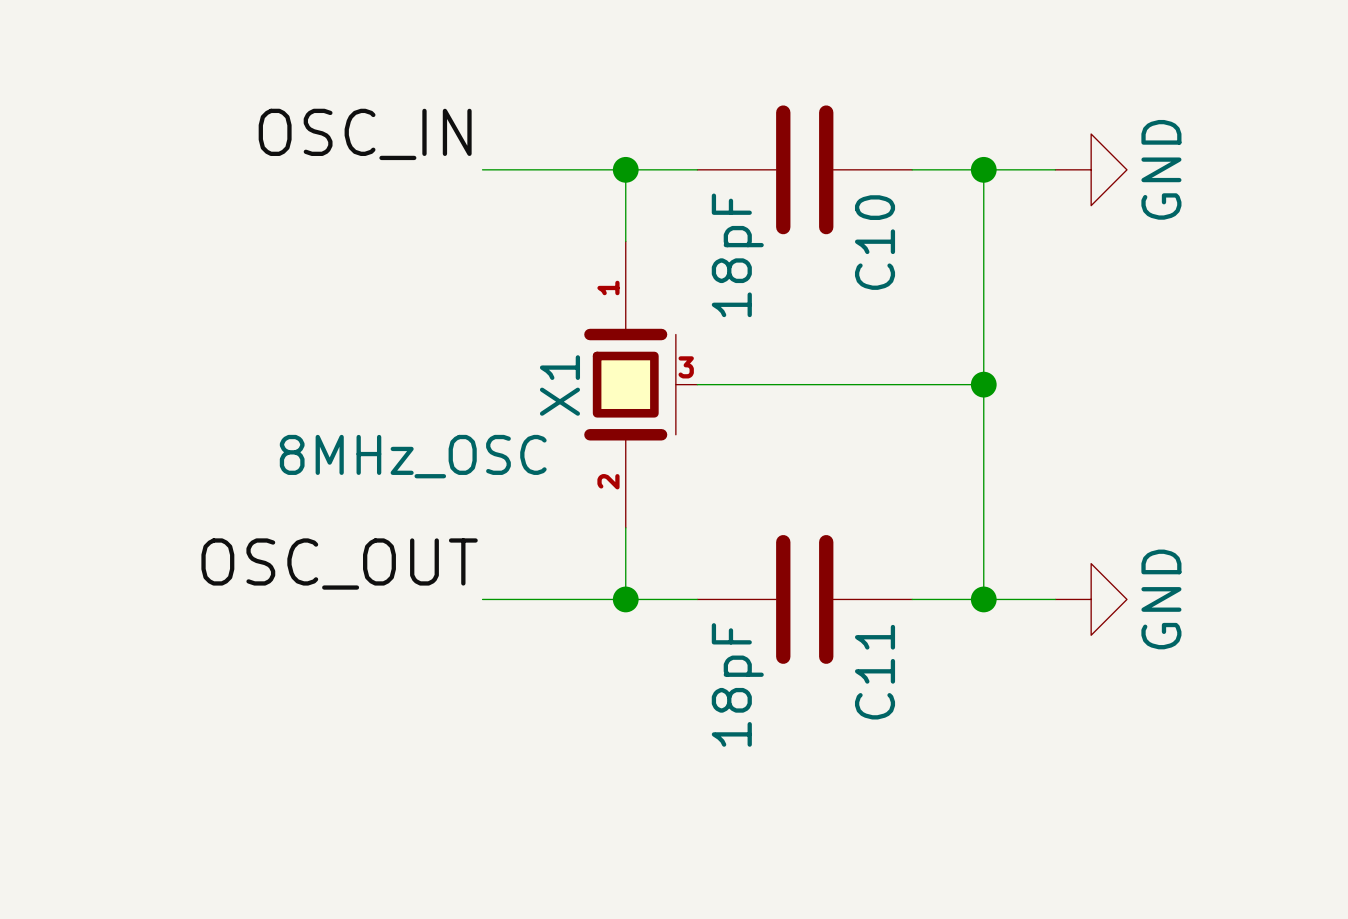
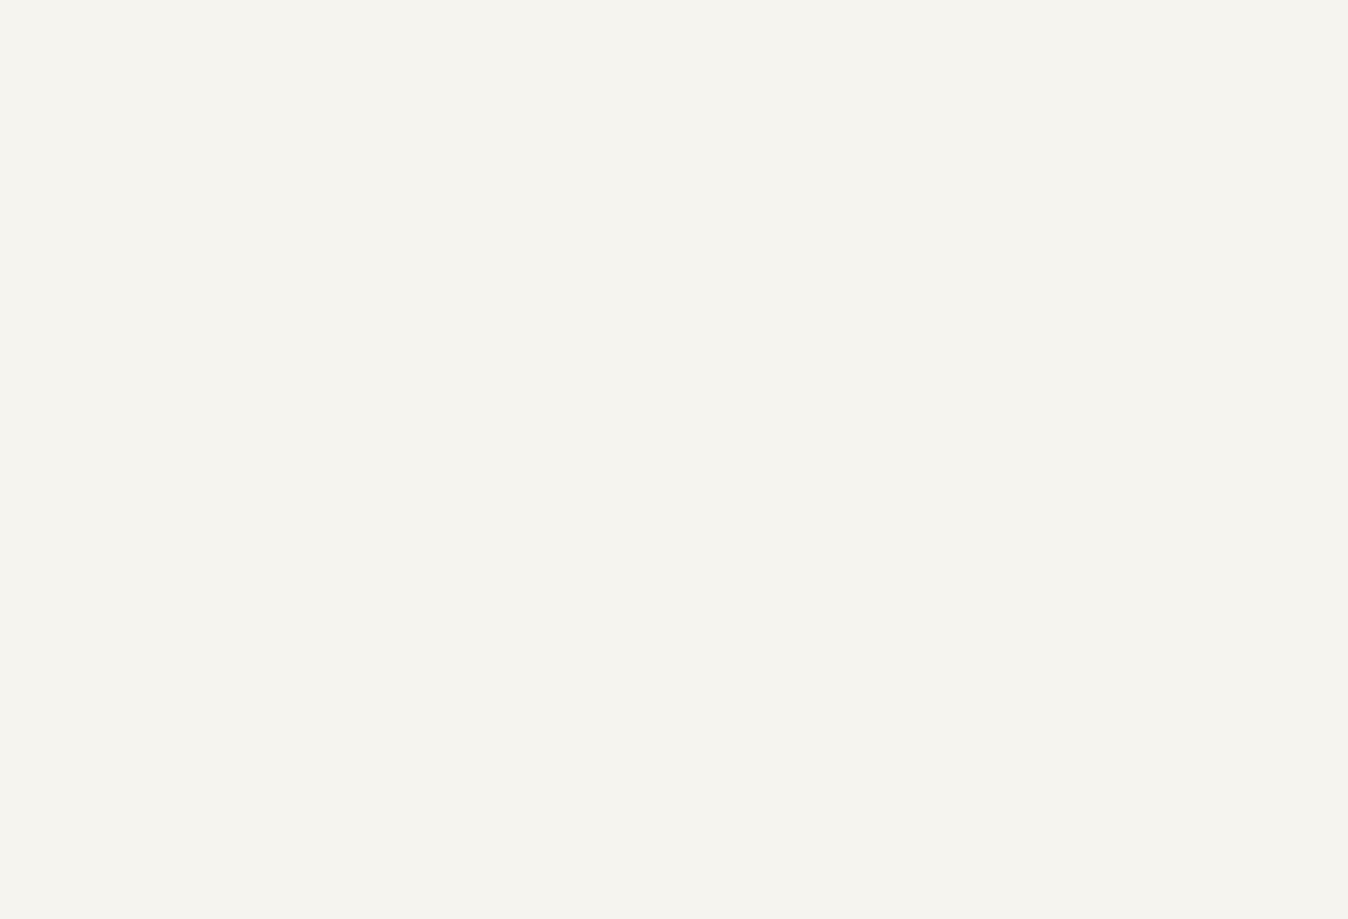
label: OSC_IN (365, 134) -> none
wire: (482, 169) (697, 169) -> none
wire: (625, 169) (625, 241) -> none
junction: (625, 169) -> none
C10: 18pF (804, 169) -> none
wire: (912, 169) (1055, 169) -> none
wire: (983, 169) (983, 599) -> none
junction: (983, 169) -> none
power symbol: GND (1091, 169) -> none
X1: 8MHz_OSC (640, 384) -> none
wire: (697, 384) (983, 384) -> none
junction: (983, 384) -> none
wire: (625, 527) (625, 599) -> none
label: OSC_OUT (339, 564) -> none
wire: (482, 599) (697, 599) -> none
junction: (625, 599) -> none
C11: 18pF (804, 599) -> none
wire: (912, 599) (1055, 599) -> none
junction: (983, 599) -> none
power symbol: GND (1091, 599) -> none

